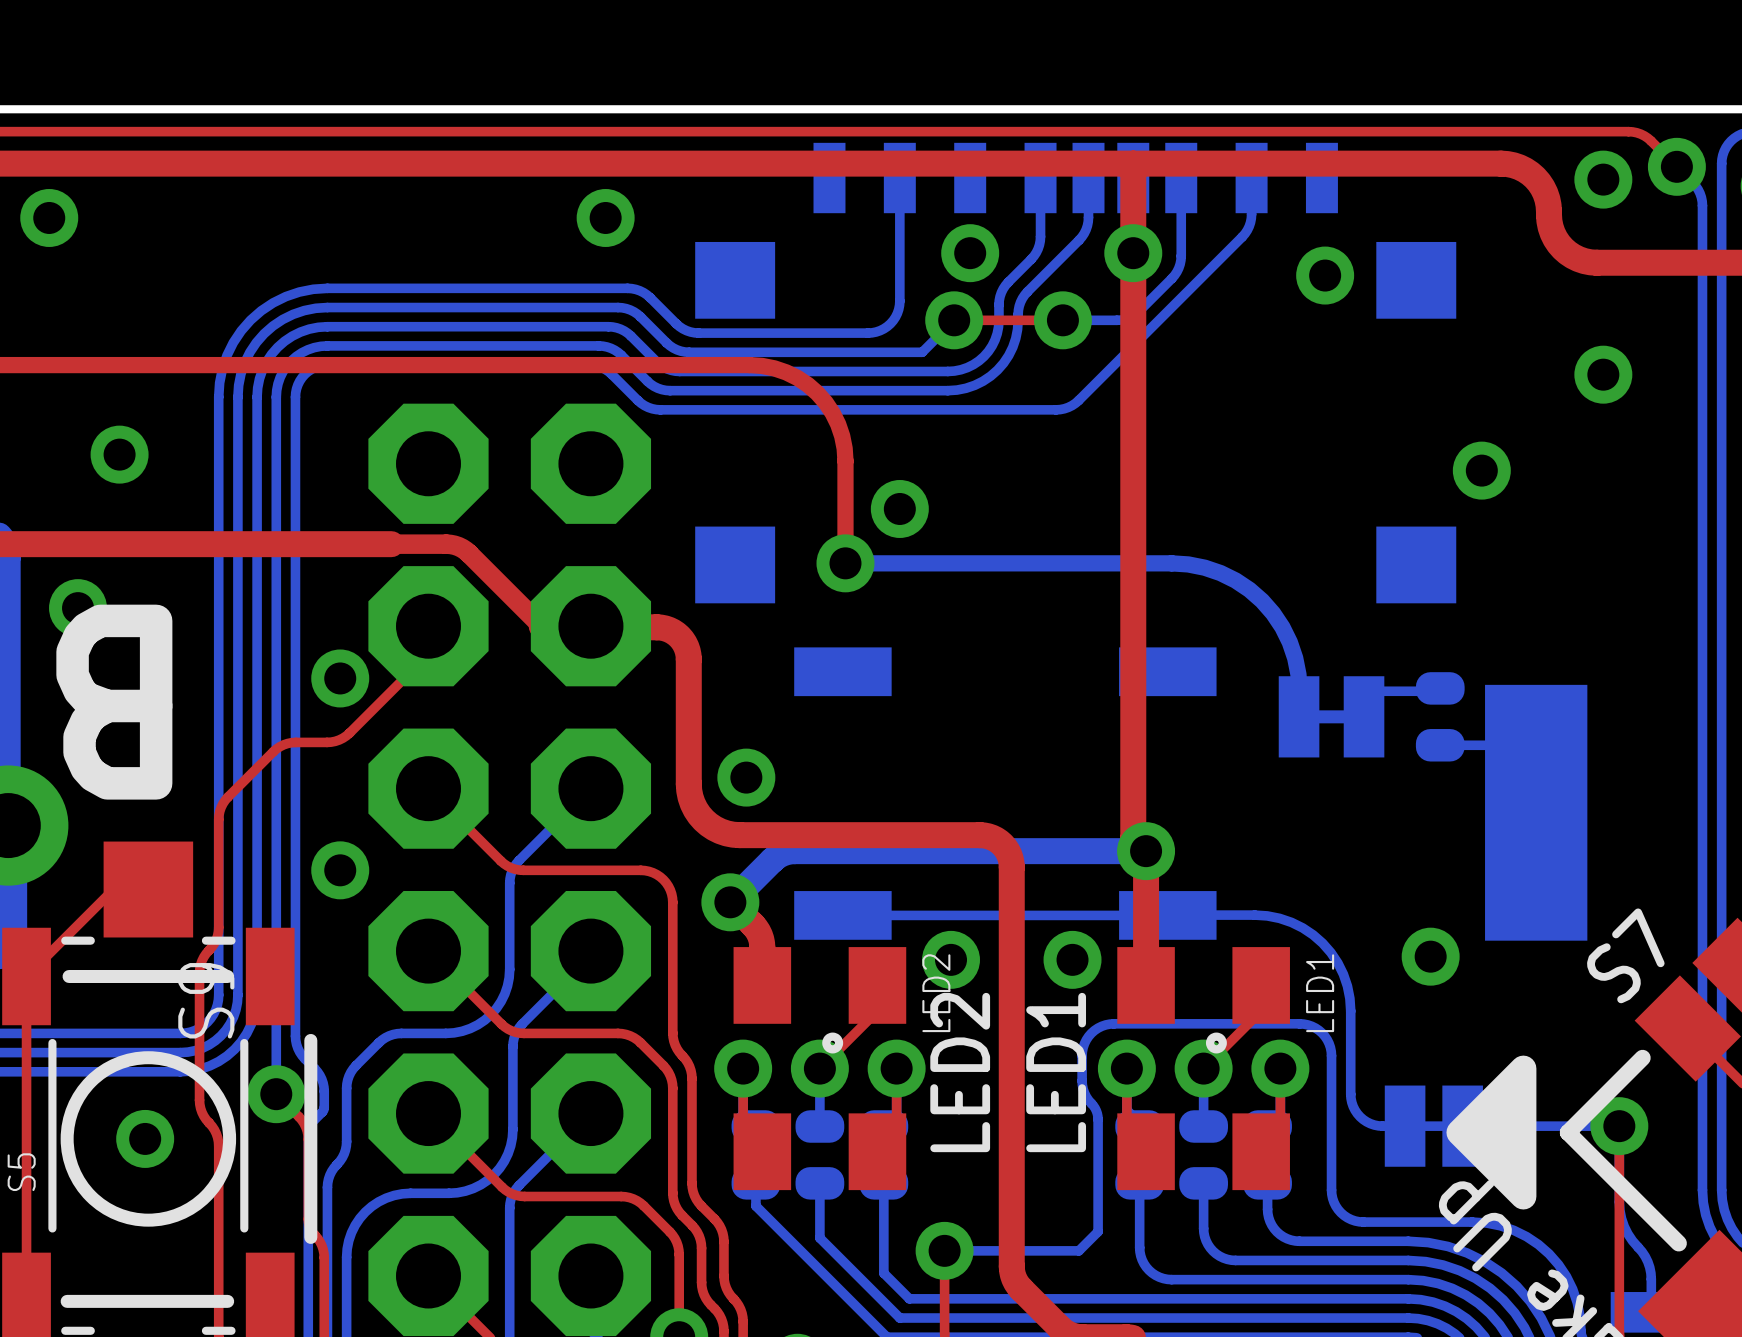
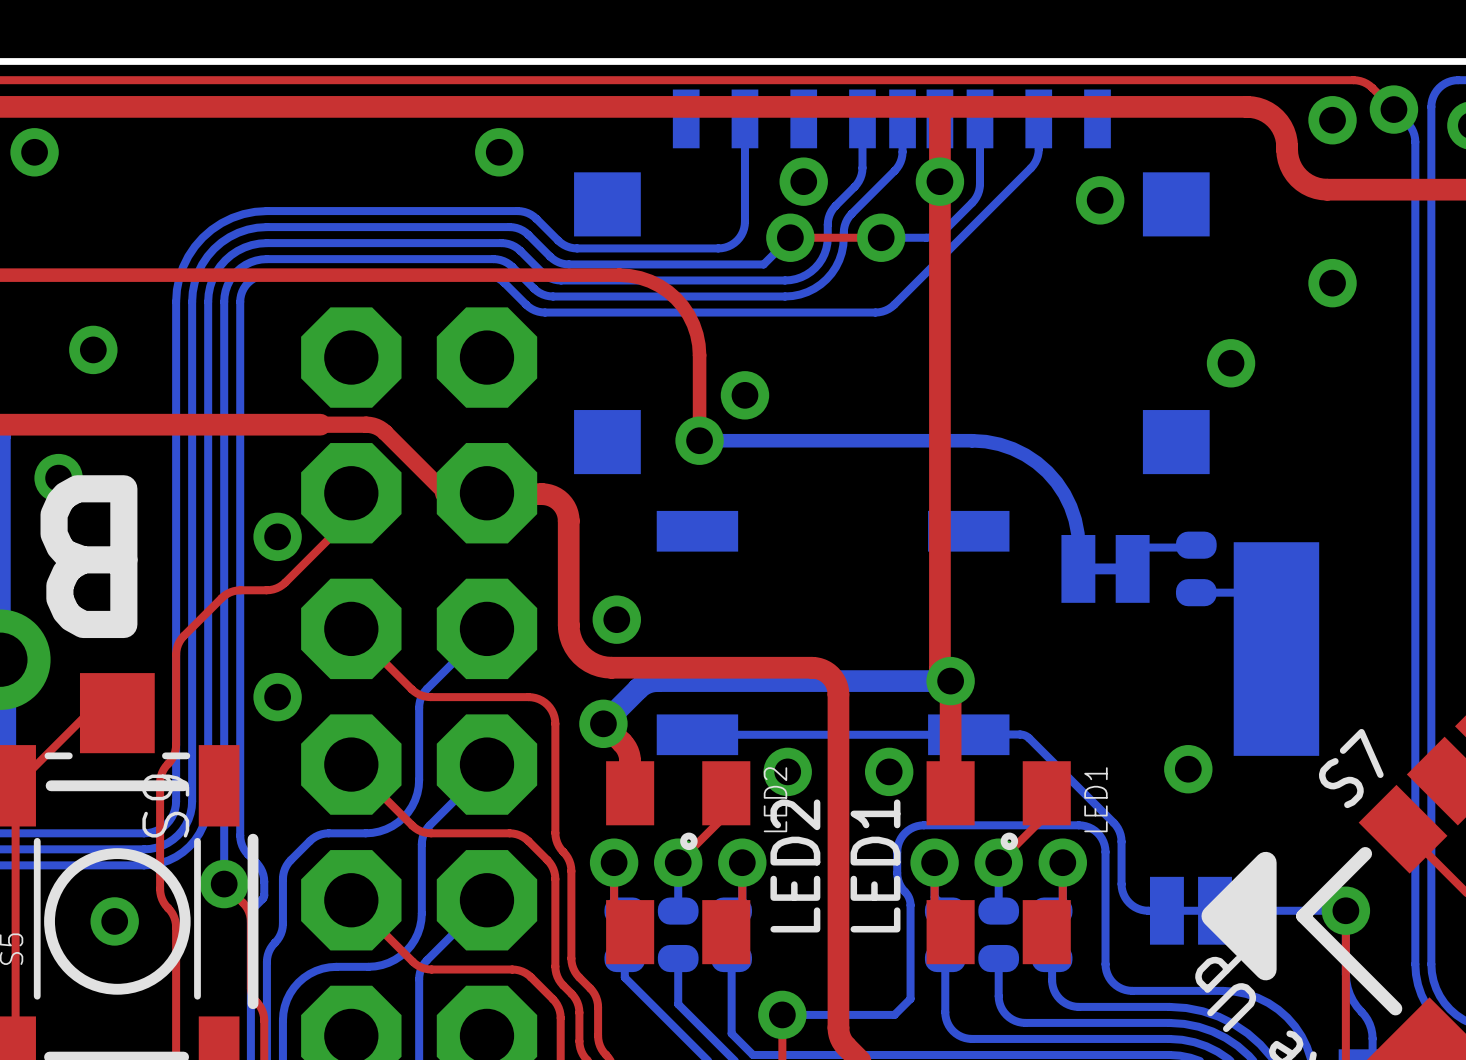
bottom track: (1229, 915) (1254, 915) (1279, 918) (1302, 927) (1322, 943) (1337, 963) (1347, 986) (1350, 1011) (1350, 1043) -> (1020, 734) (1029, 738) (1113, 822) (1119, 831) (1121, 841)

